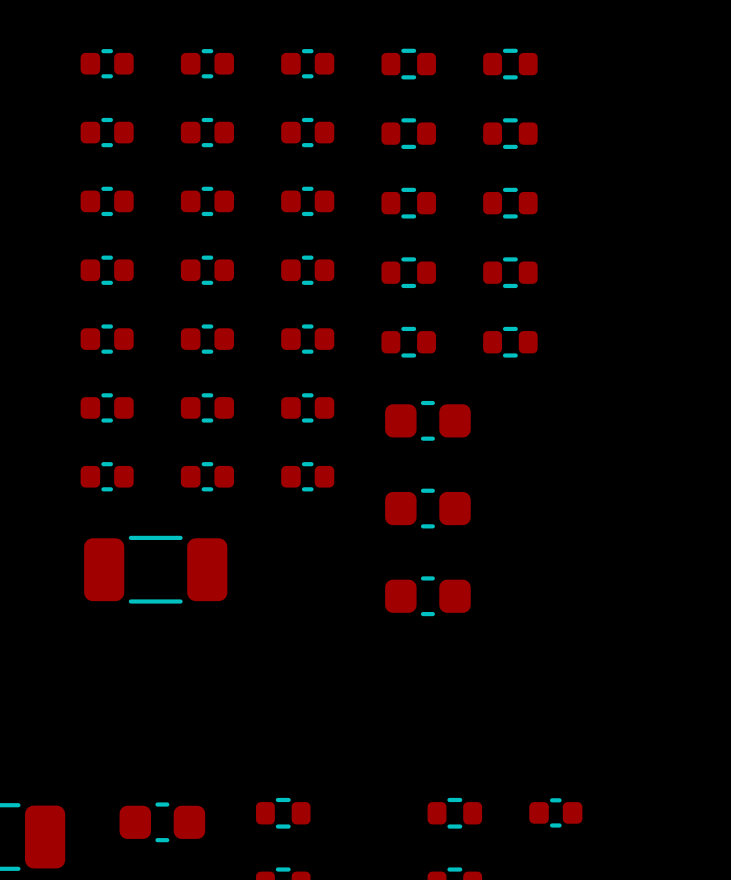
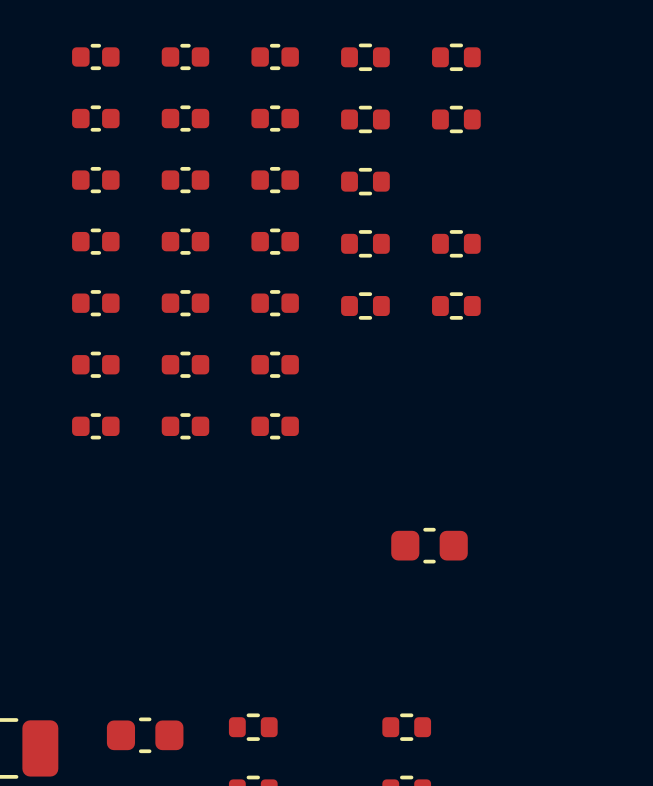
part: (510, 203) -> none
part: (427, 420) -> none
part: (427, 508) -> none
part: (155, 569) -> none
part position: (427, 596) -> (429, 545)
part: (555, 812) -> none

